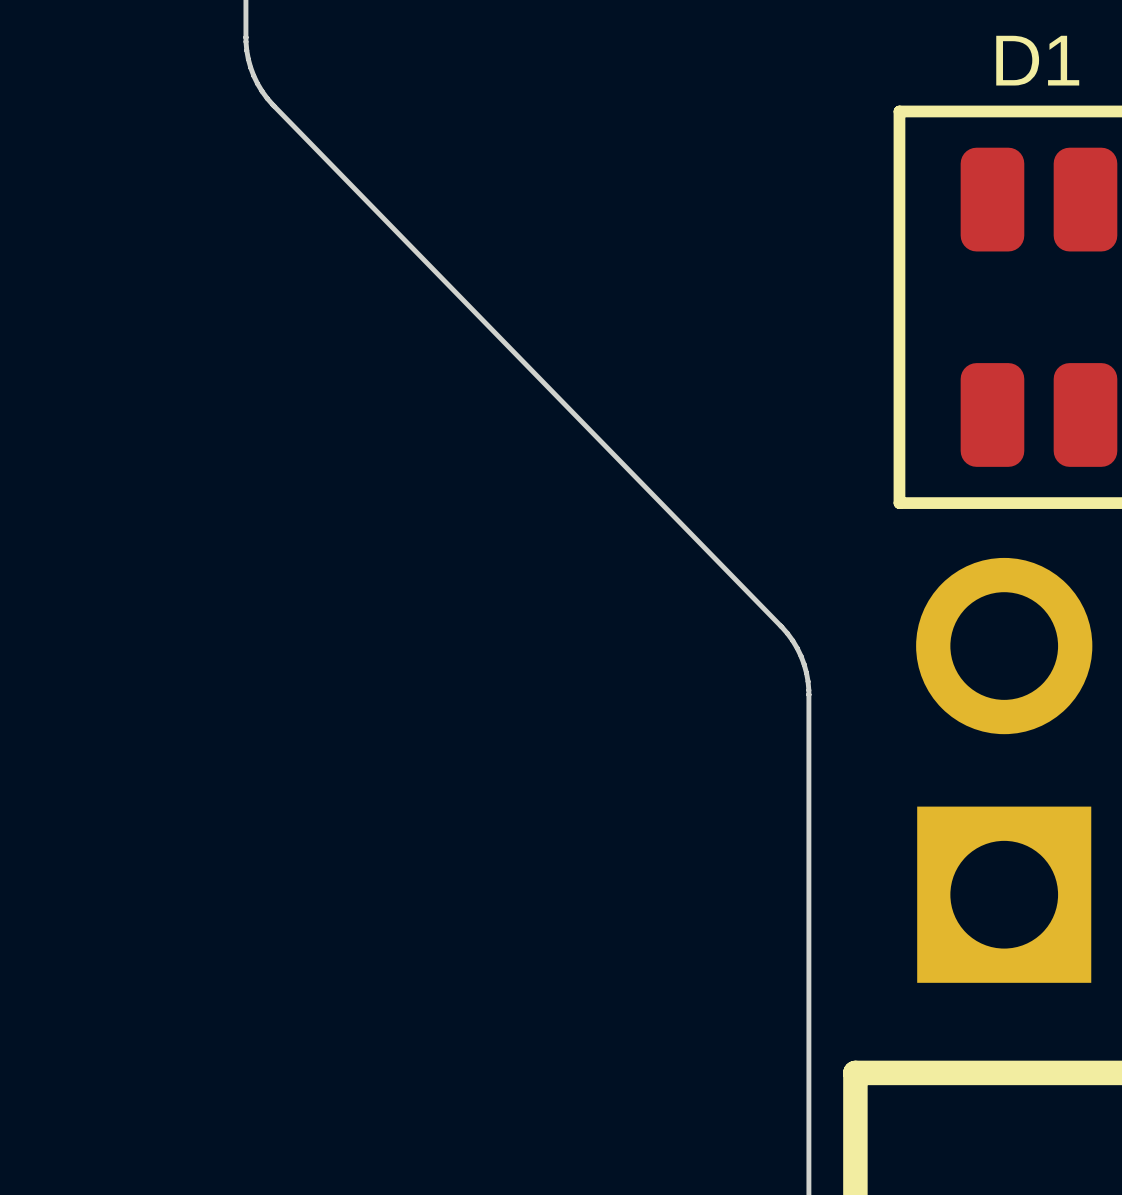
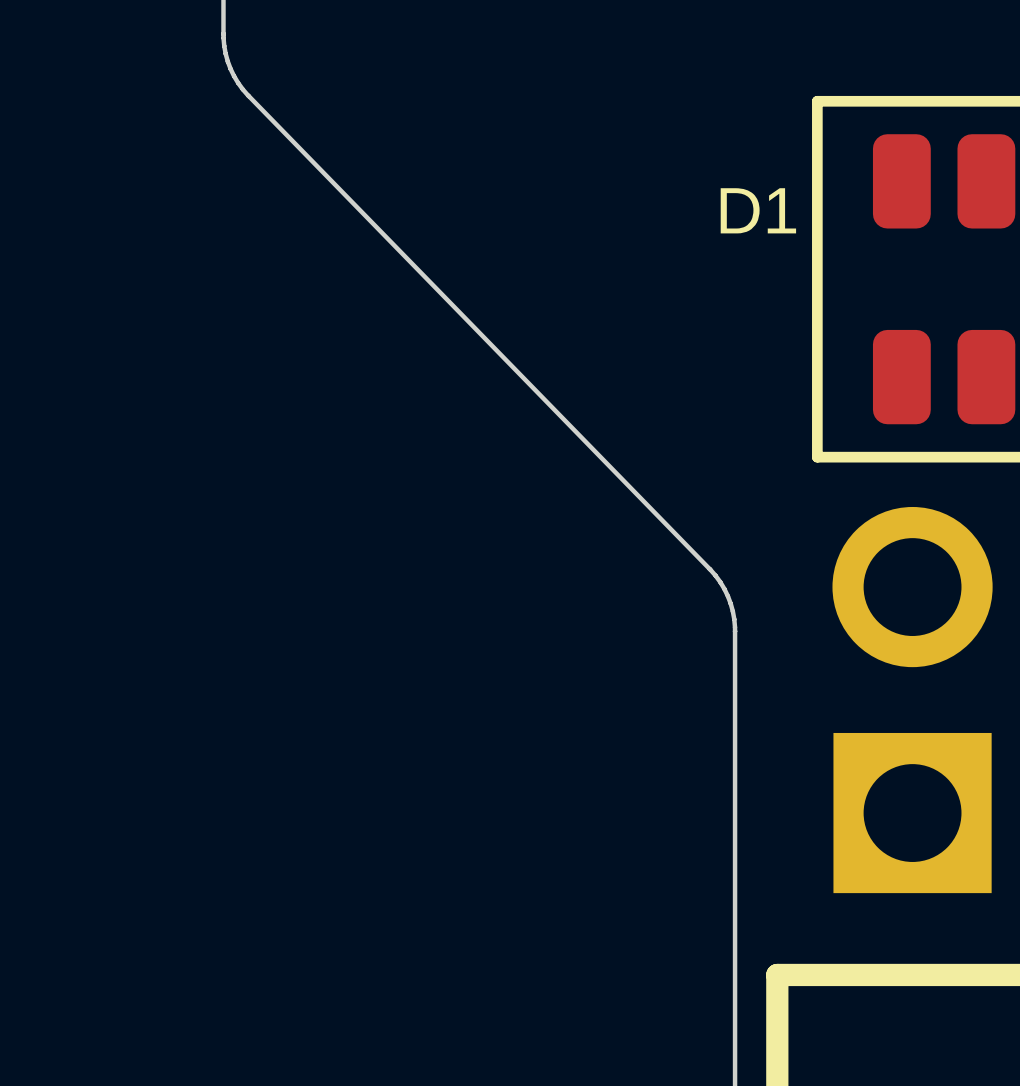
D1 name position: D1 (1037, 60) -> D1 (758, 210)

